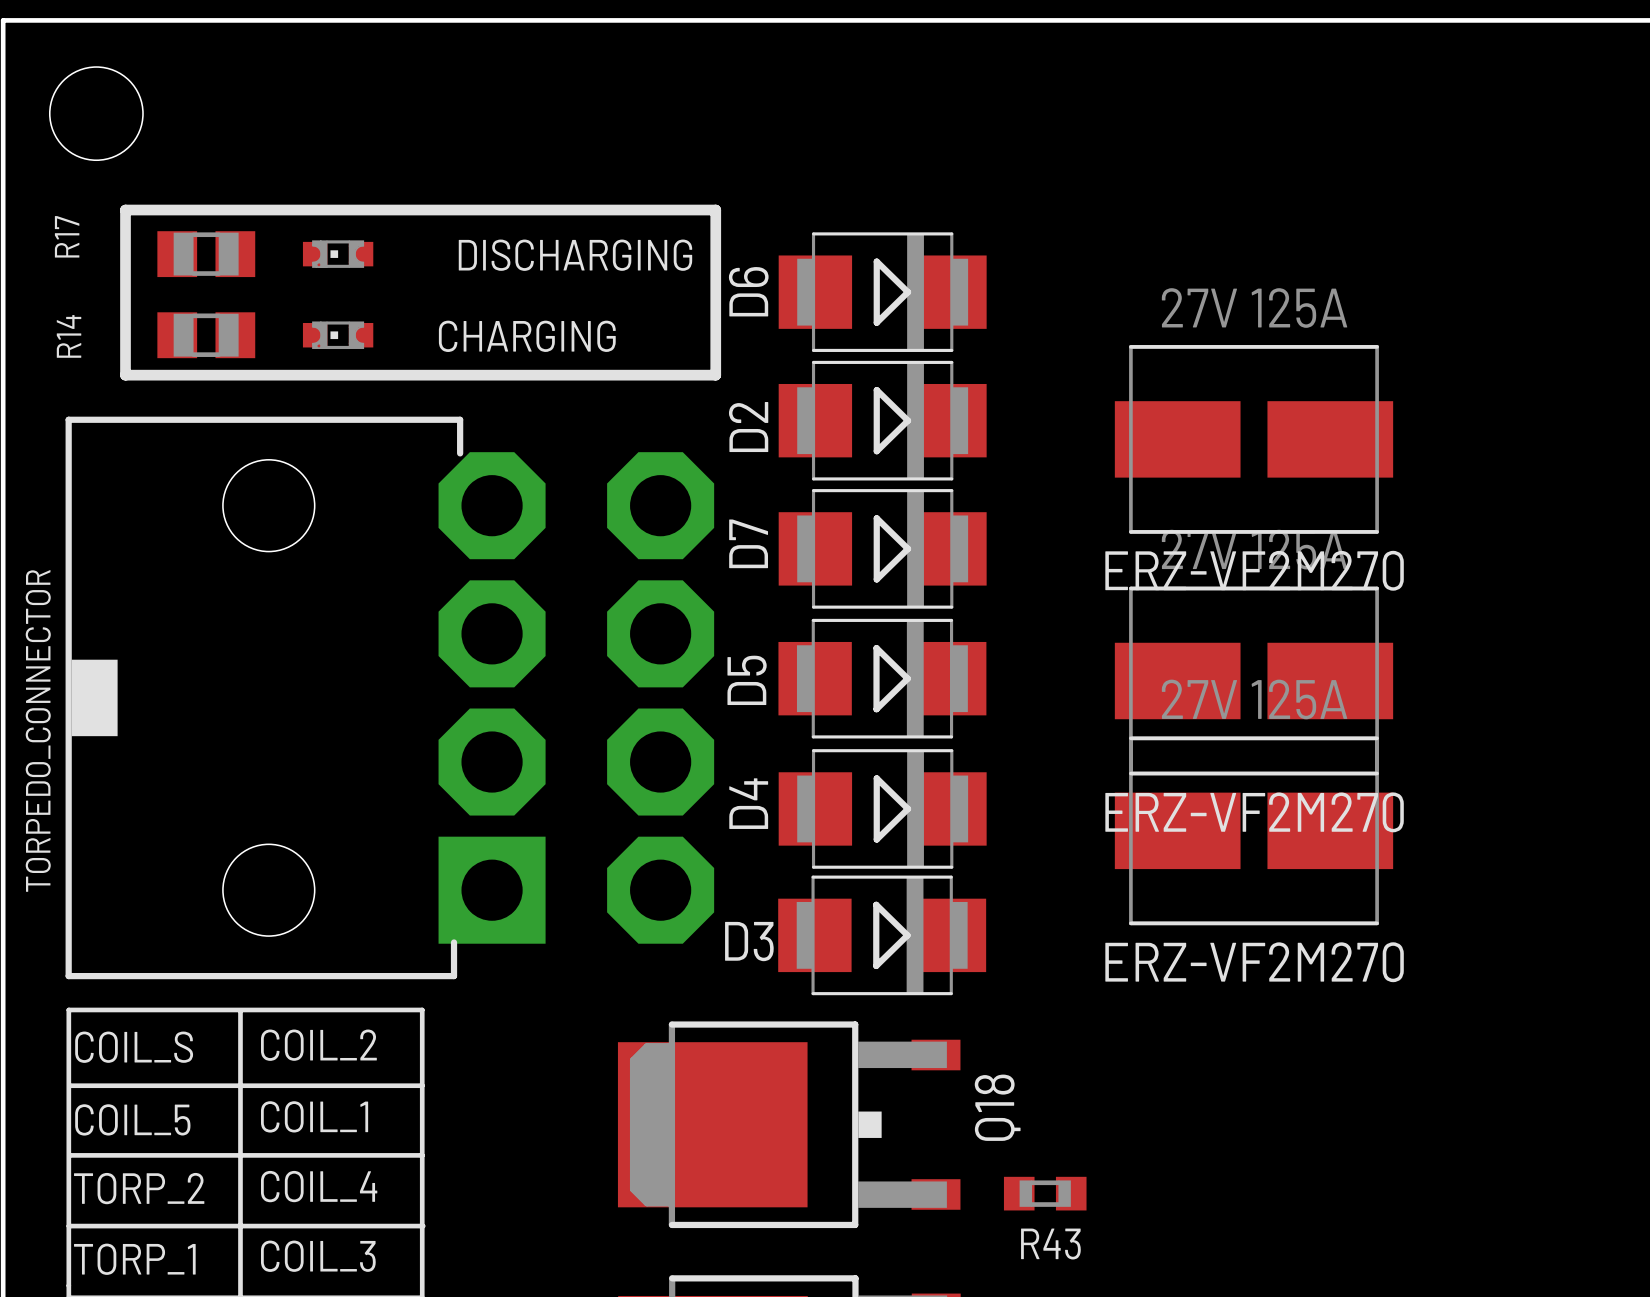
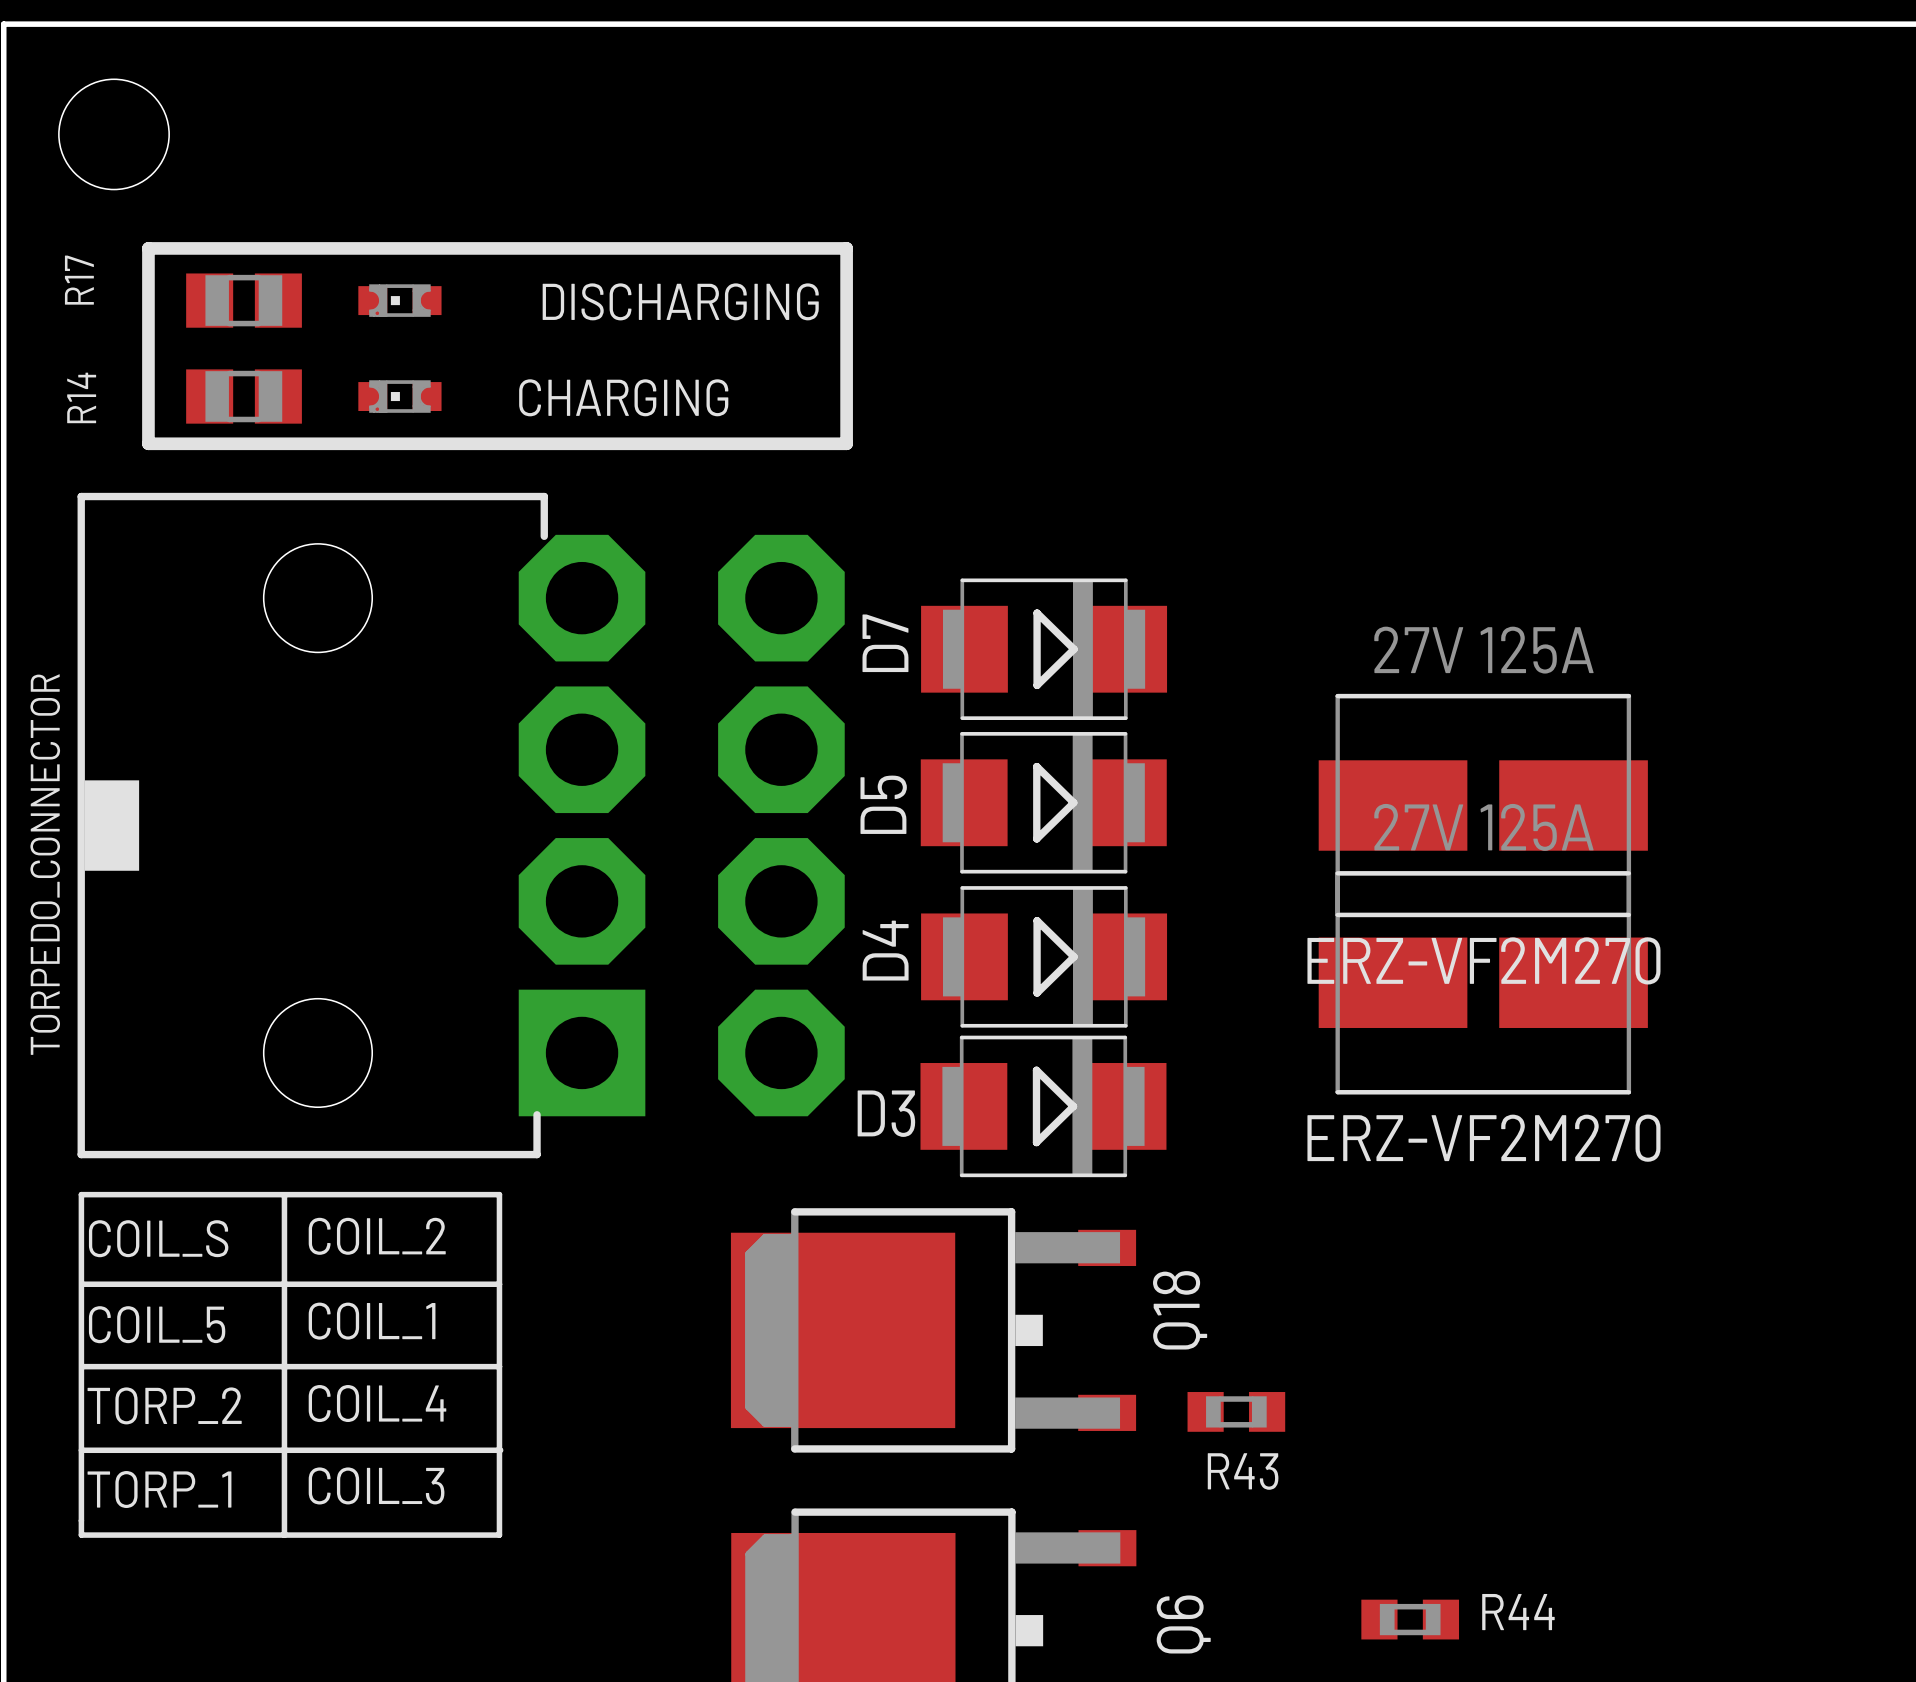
D6: (882, 292) -> none
D2: (882, 420) -> none
part: (1253, 439) -> none

